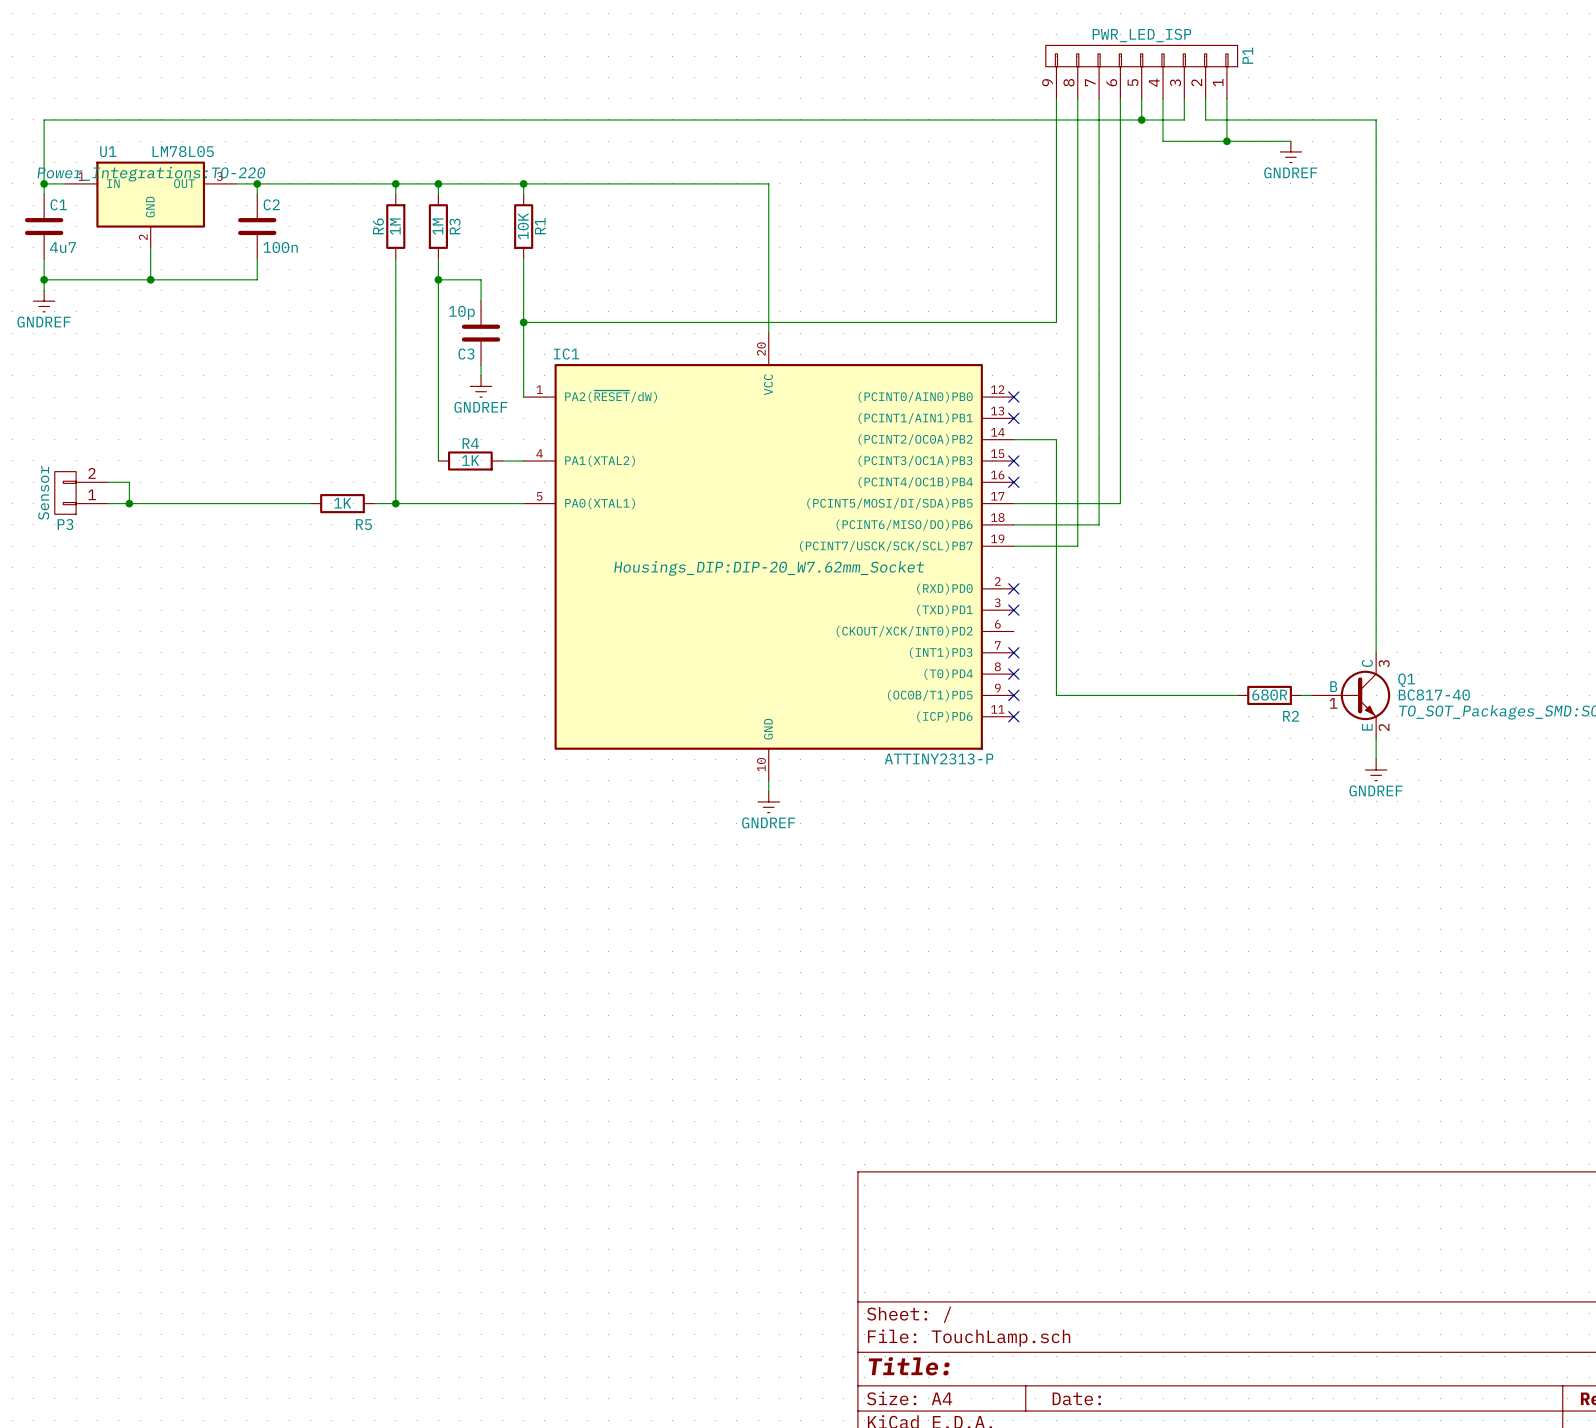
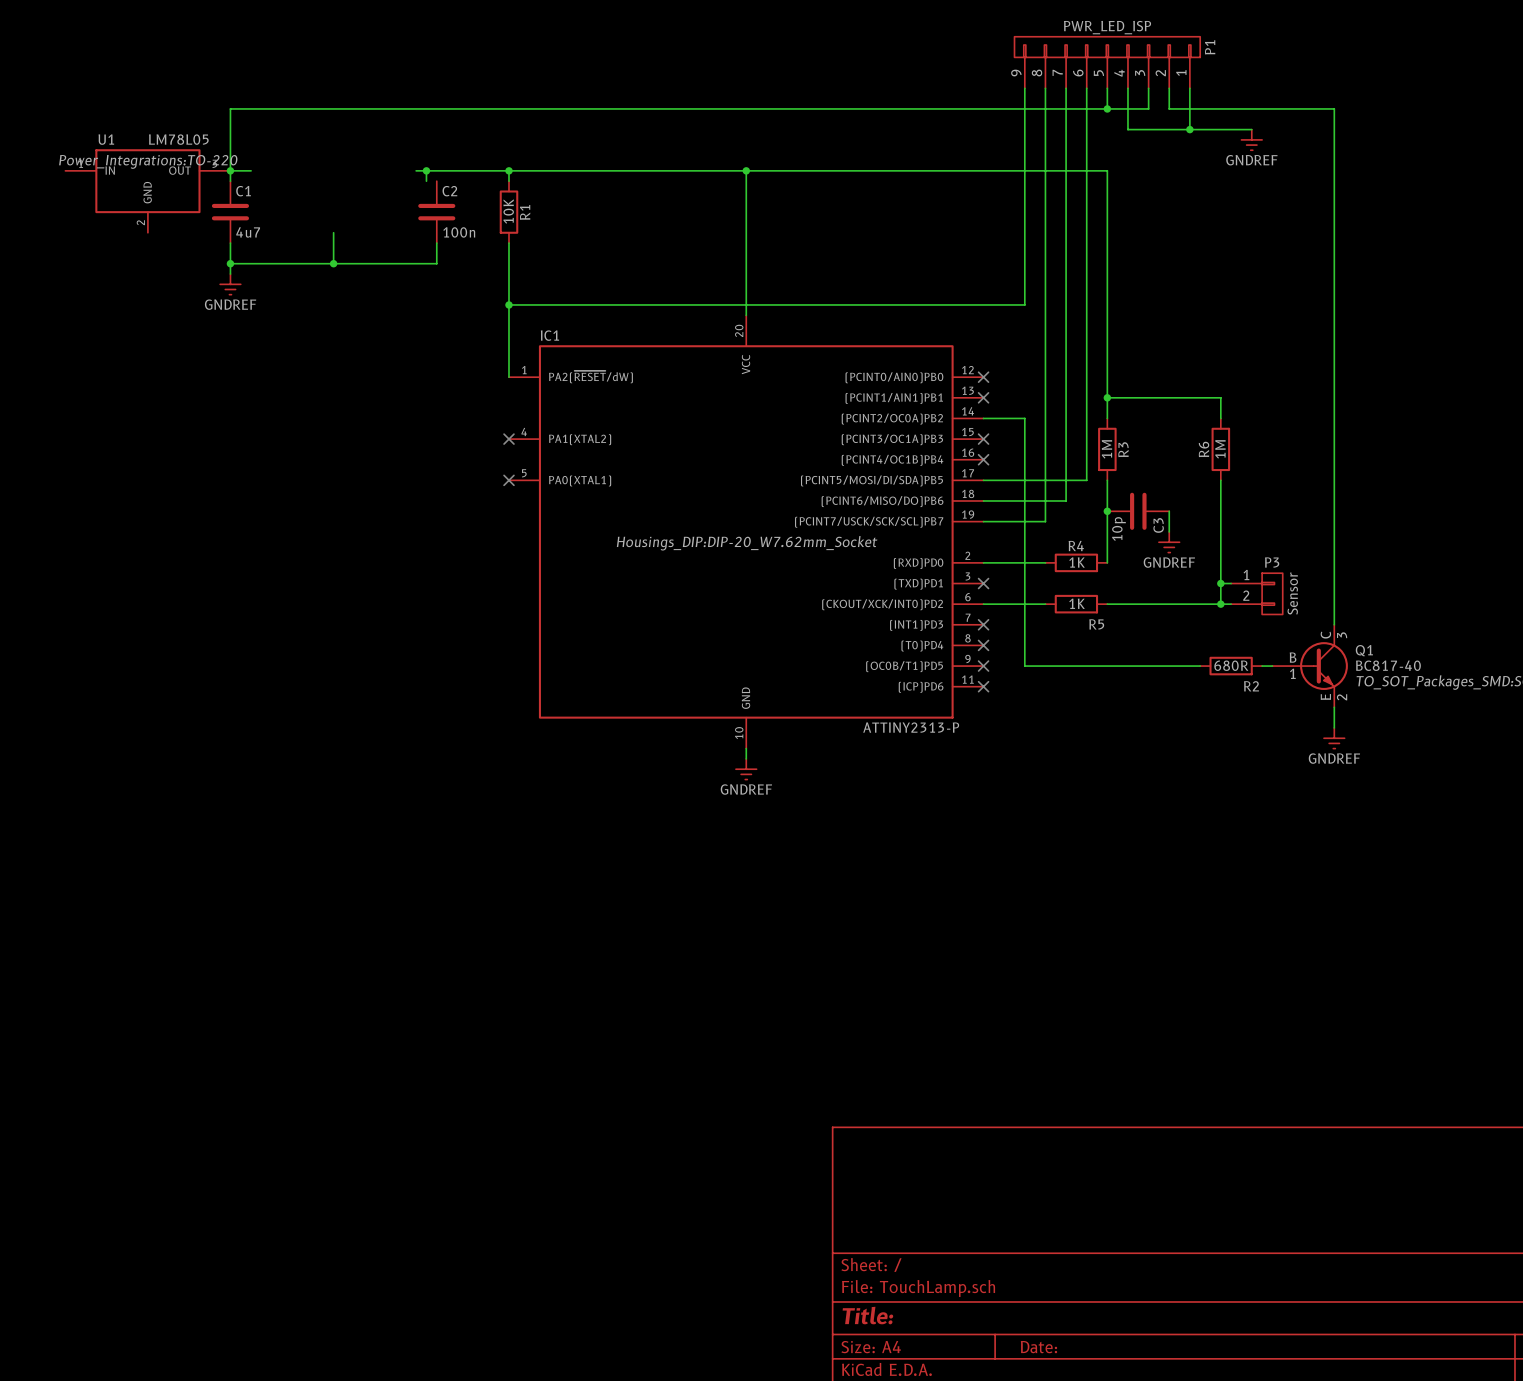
wire: (235, 119) (44, 119) (44, 194) -> (230, 108) (230, 181)
wire: (44, 183) (65, 183) -> none
junction: (44, 183) -> none
junction position: (257, 183) -> (230, 170)
wire: (395, 183) (395, 194) -> none
junction: (395, 183) -> none
wire: (427, 183) (257, 183) (257, 194) -> none
wire: none -> (746, 170) (1107, 170) (1107, 418)
junction: none -> (746, 170)
C1 position: (44, 226) -> (230, 212)
C2 position: (257, 226) -> (436, 212)
R6 position: (395, 226) -> (1220, 449)
R3 position: (438, 226) -> (1107, 449)
wire: (150, 247) (150, 279) -> (333, 232) (333, 263)
wire: (44, 258) (44, 290) -> (230, 243) (230, 274)
wire: (257, 258) (257, 279) -> (426, 263) (251, 263)
wire: (395, 258) (395, 503) -> none
wire: (438, 258) (438, 460) -> none
wire: (44, 279) (235, 279) -> none
junction: (44, 279) -> none
junction: (150, 279) -> none
junction: none -> (230, 263)
junction: none -> (333, 263)
junction: (438, 279) -> none
wire: (449, 279) (481, 279) (481, 301) -> (436, 263) (436, 243)
power symbol: GNDREF (44, 301) -> none
power symbol: none -> GNDREF (230, 284)
C3 value position: 10p (461, 312) -> 10p (1118, 529)
C3 rotation: 0° (481, 333) -> 90° clockwise (1138, 511)
C3 position: (481, 333) -> (1138, 511)
C3 name position: C3 (466, 354) -> C3 (1158, 525)
wire: (481, 365) (481, 375) -> none
power symbol: GNDREF (481, 386) -> none
wire: none -> (1107, 397) (1220, 397) (1220, 418)
junction: none -> (1107, 397)
R4 position: (470, 460) -> (1076, 562)
wire: (502, 460) (523, 460) -> none
no-connect mark: none -> (508, 439)
wire: (108, 482) (129, 482) (129, 503) -> none
P3 rotation: 0° (65, 492) -> 180° (1272, 593)
P3 position: (81, 492) -> (1256, 593)
wire: (108, 503) (310, 503) -> none
junction: (129, 503) -> none
R5 position: (342, 503) -> (1076, 604)
wire: (374, 503) (523, 503) -> none
junction: (395, 503) -> none
no-connect mark: none -> (508, 480)
wire: none -> (1107, 480) (1107, 562)
wire: none -> (1220, 480) (1220, 604)
junction: none -> (1107, 511)
wire: none -> (1169, 511) (1169, 531)
power symbol: none -> GNDREF (1169, 542)
wire: none -> (983, 562) (1045, 562)
no-connect mark: (1013, 588) -> none
wire: none -> (1220, 583) (1231, 583)
junction: none -> (1220, 583)
wire: none -> (983, 604) (1045, 604)
wire: none -> (1107, 604) (1231, 604)
junction: none -> (1220, 604)

